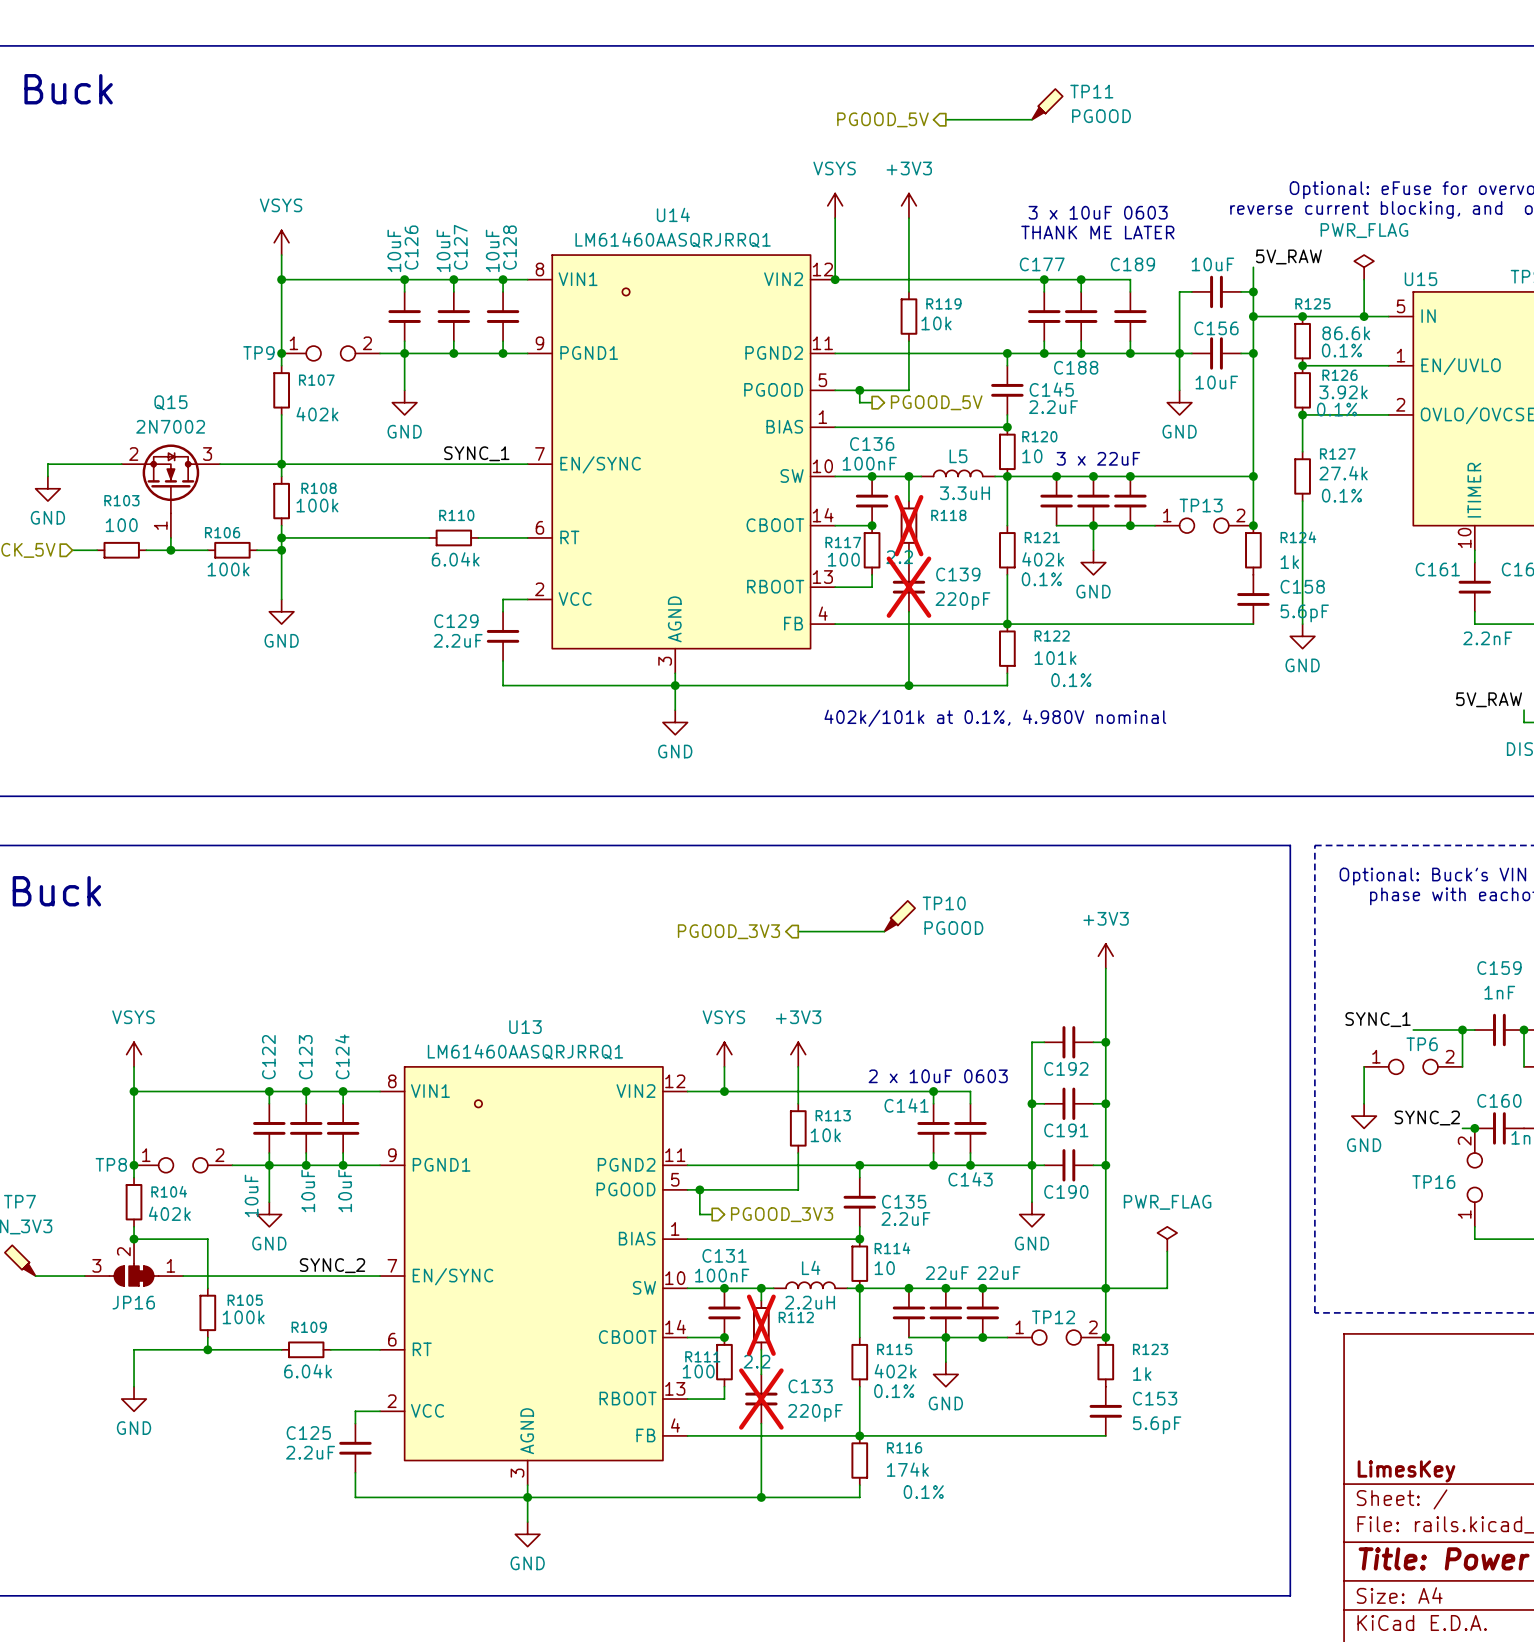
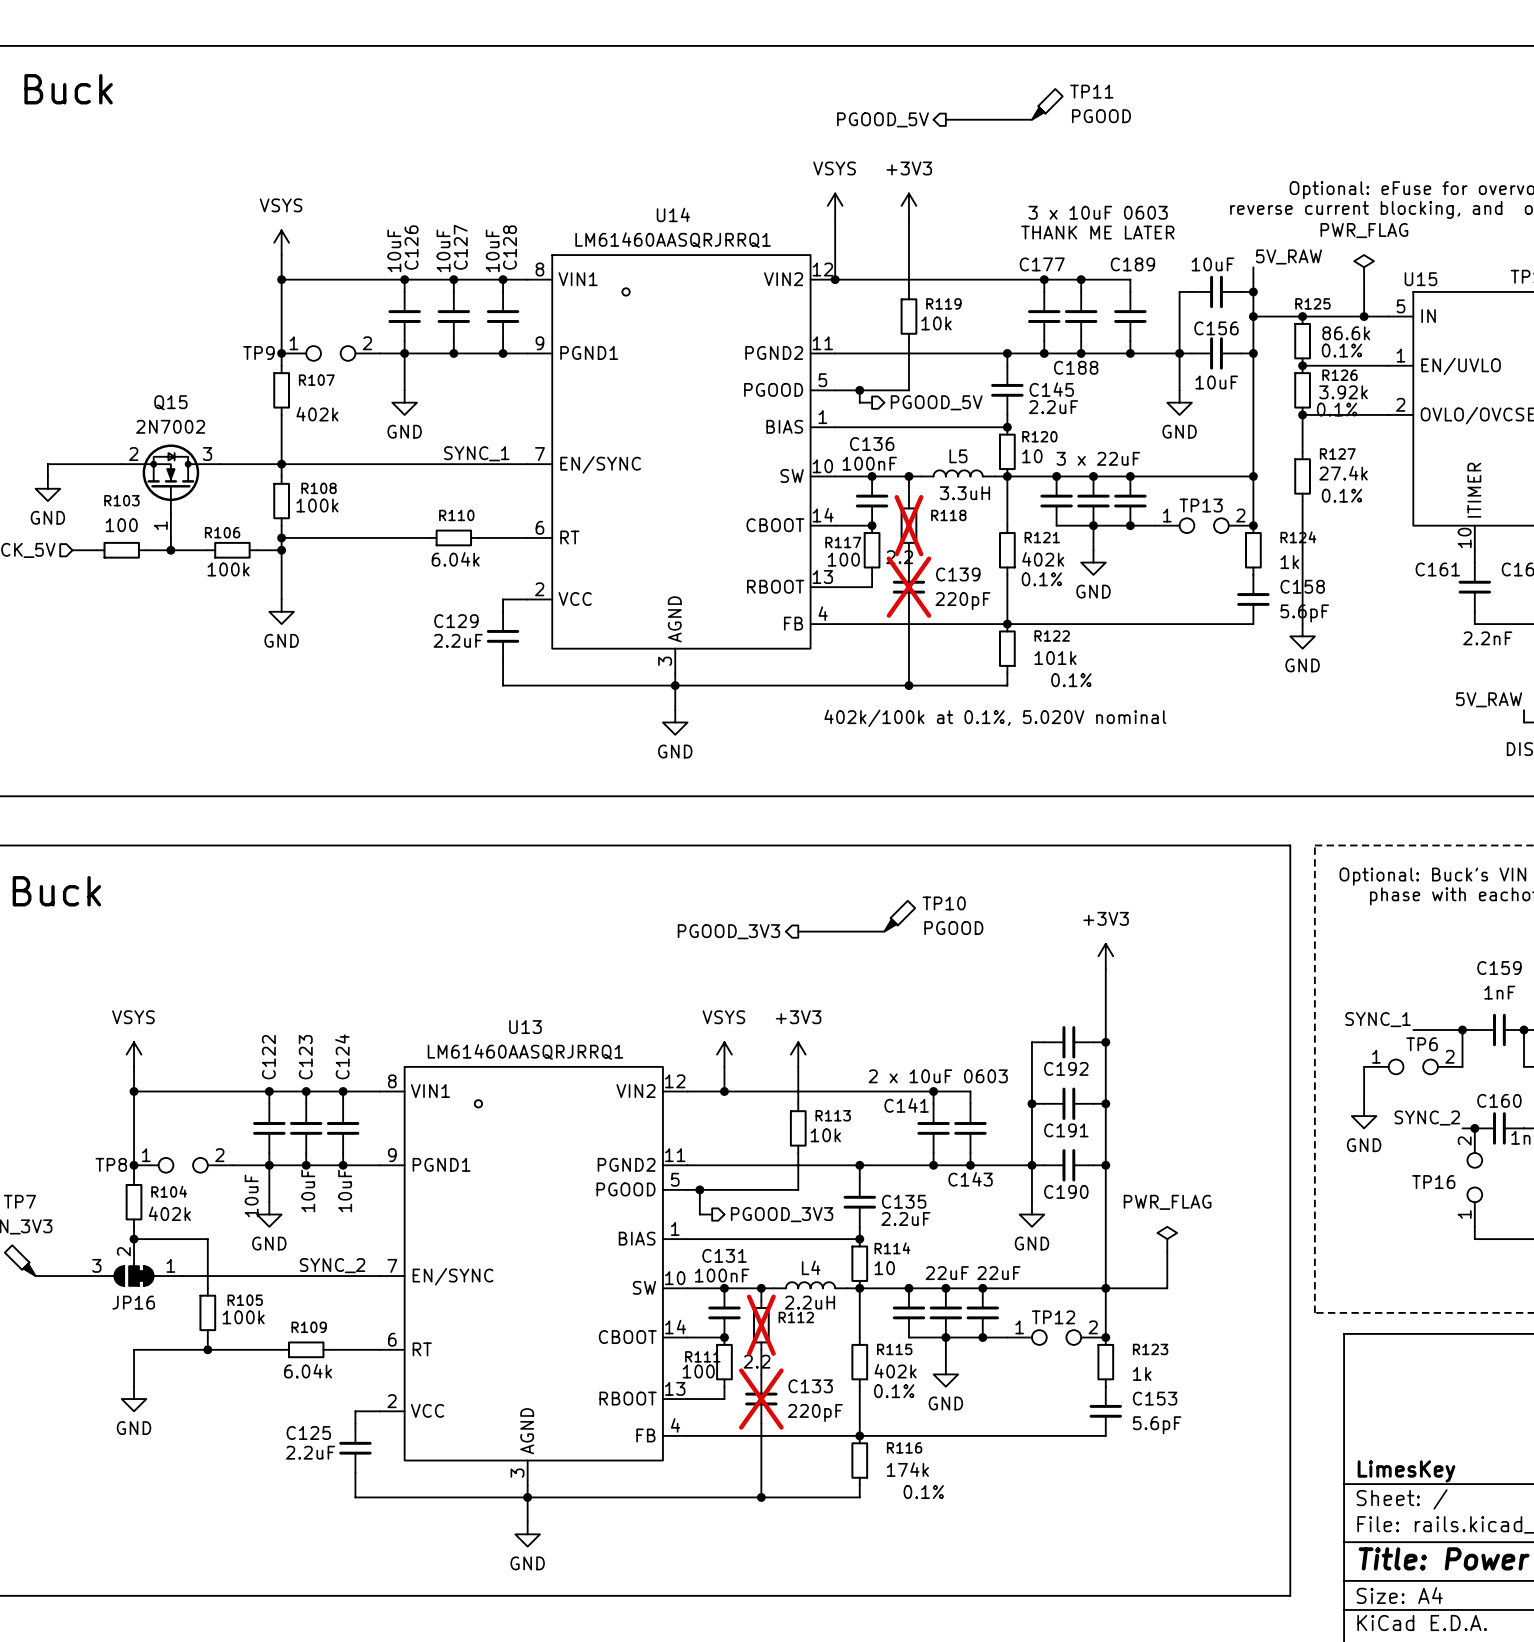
text: 402k/101k at 0.1%, 4.980V nominal (995, 718) -> 402k/100k at 0.1%, 5.020V nominal (995, 718)

